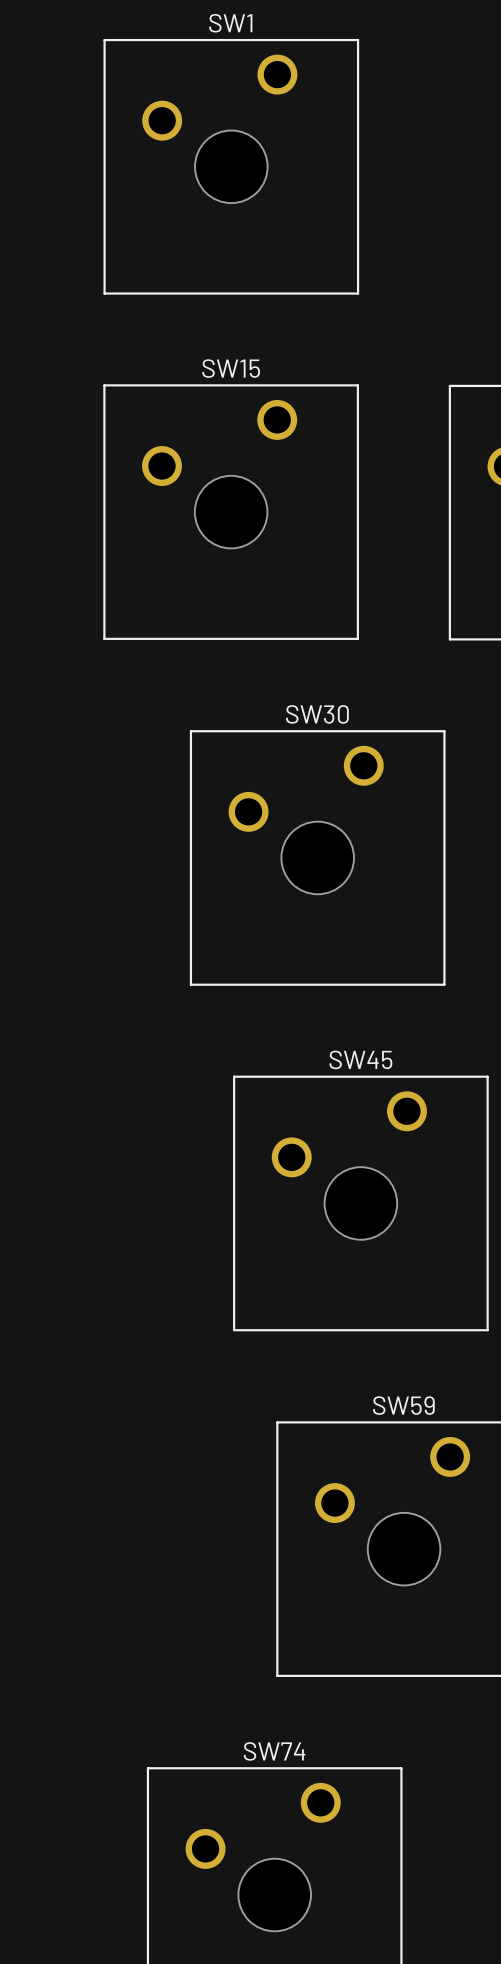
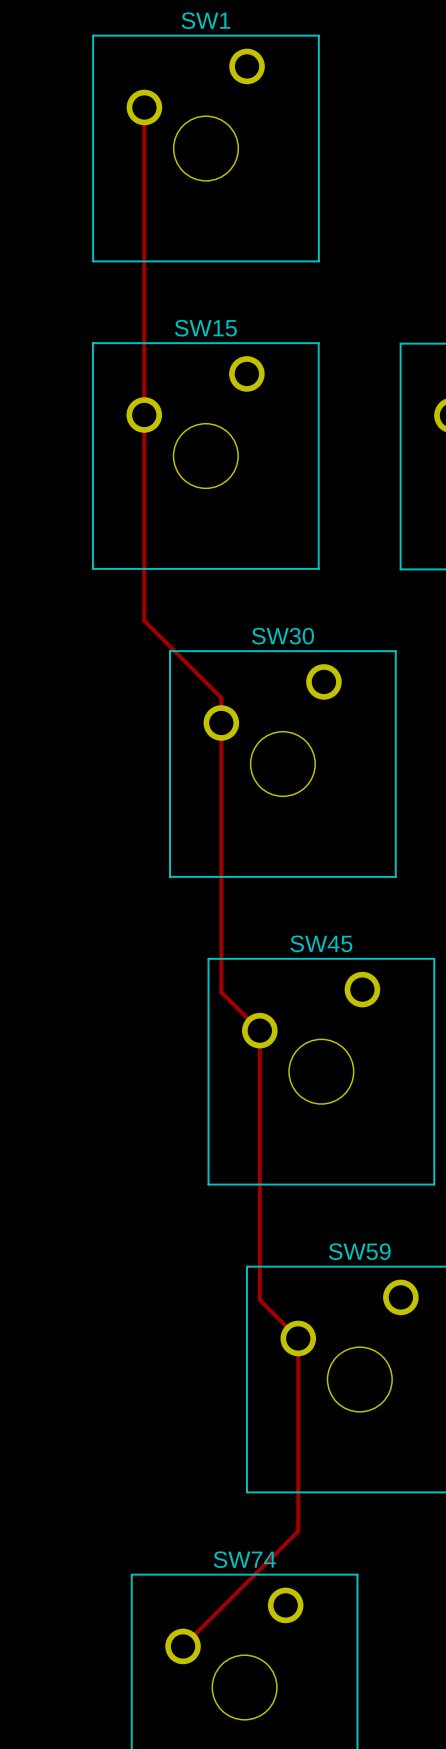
track: none -> (144, 107) (144, 620) (221, 697) (221, 992) (259, 1030) (259, 1300) (298, 1338) (298, 1531) (183, 1646)

